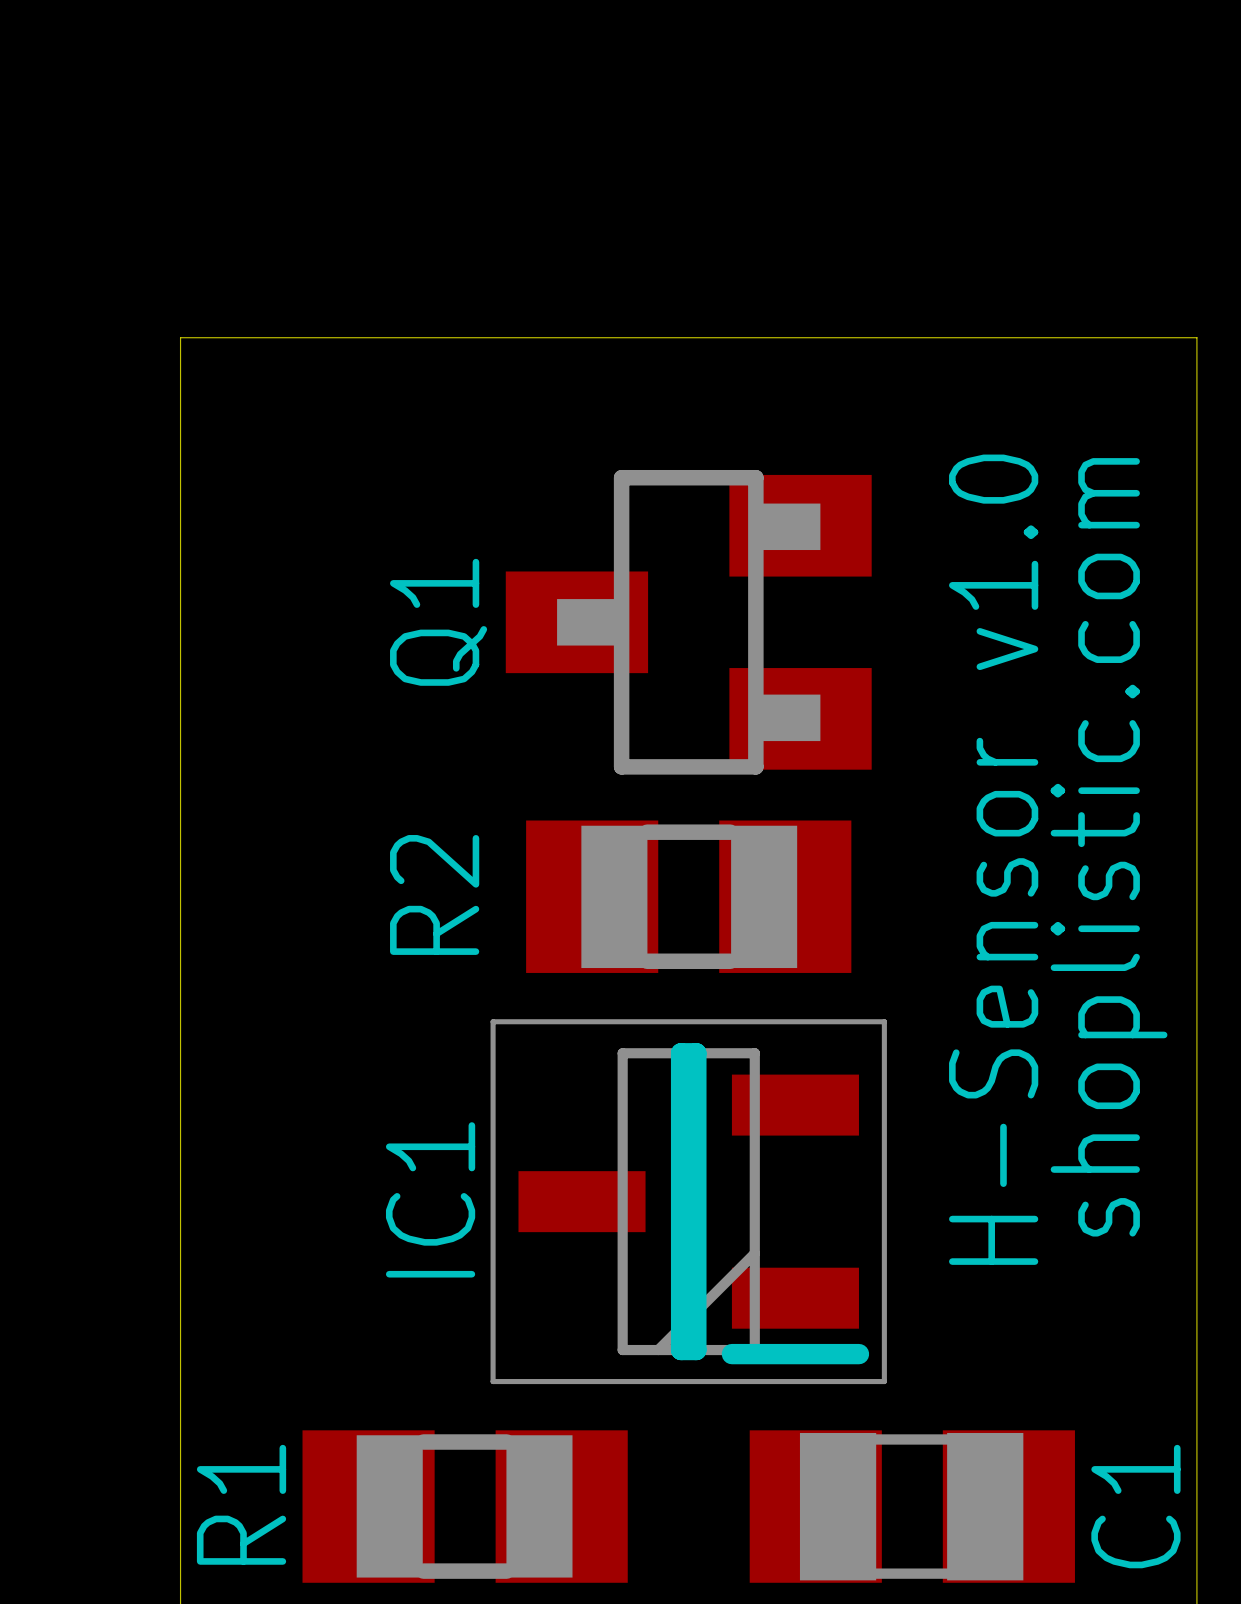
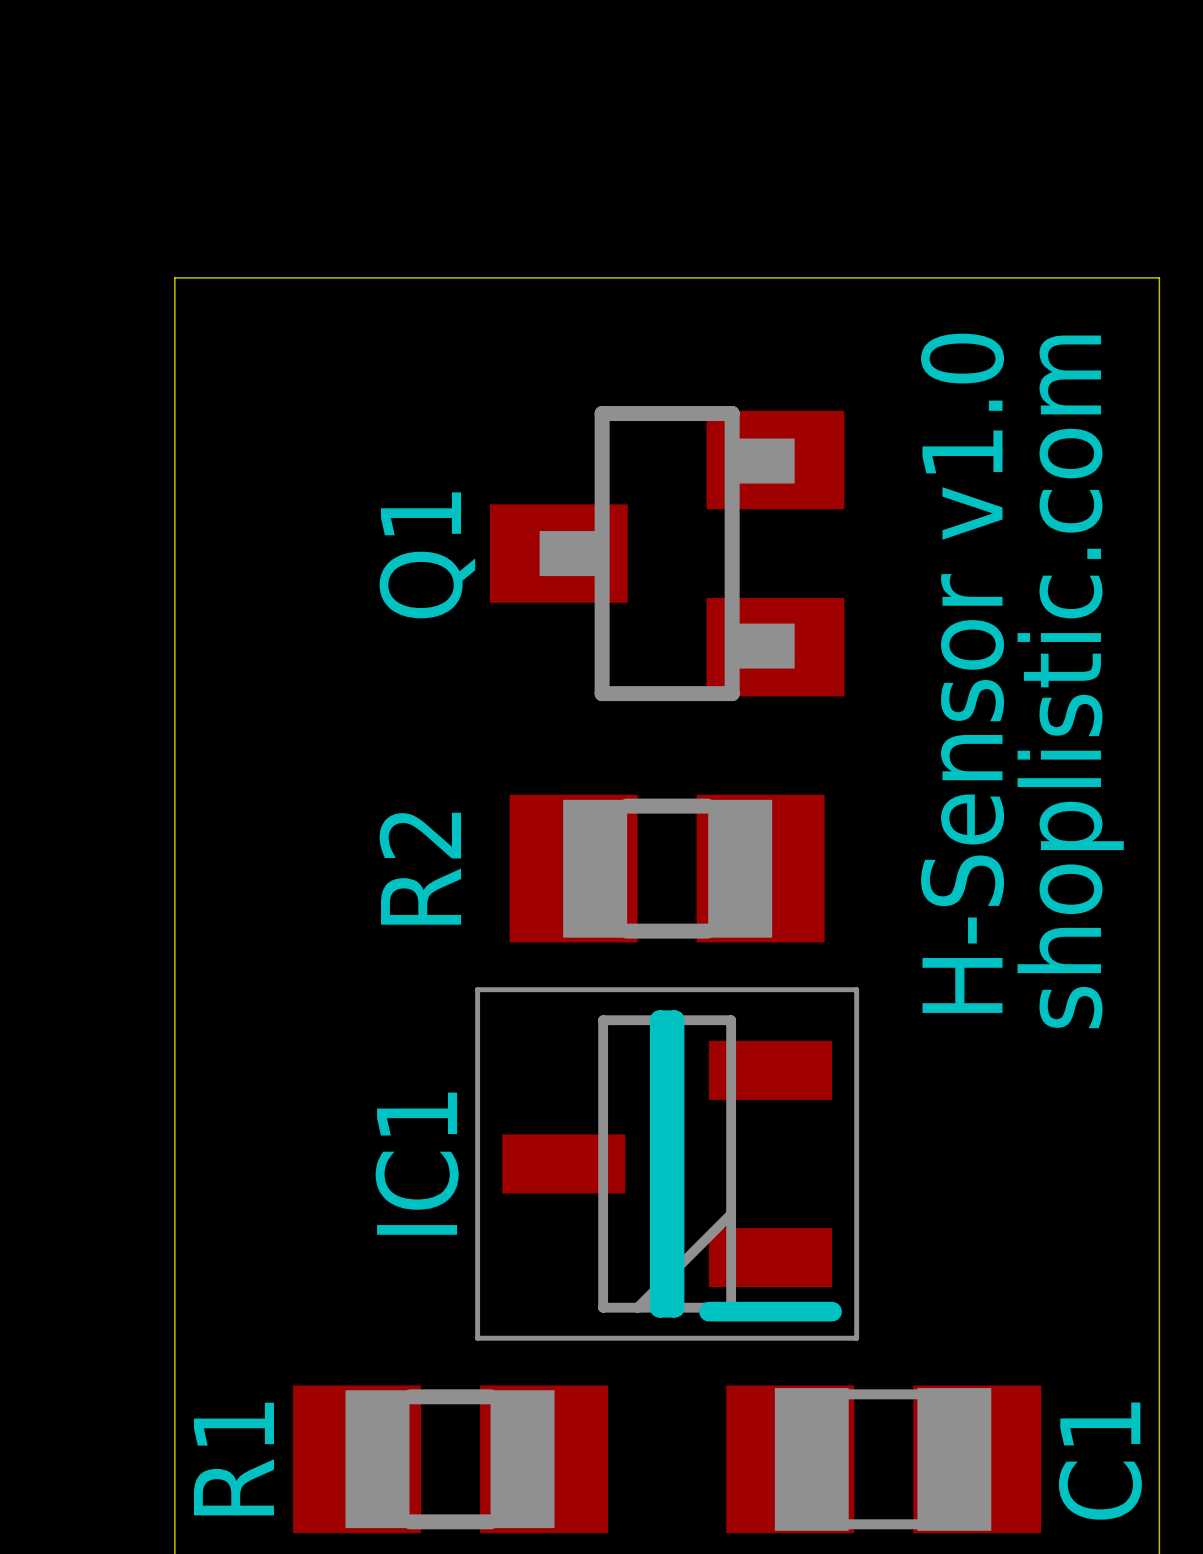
board edge: (180, 337) (1196, 337) -> (174, 327) (174, 277) (1159, 277) (1159, 327)
Q1 position: (688, 622) -> (667, 553)
text position: shoplistic.com (1109, 847) -> shoplistic.com (1070, 681)
text position: H-Sensor v1.0 (993, 859) -> H-Sensor v1.0 (962, 673)

